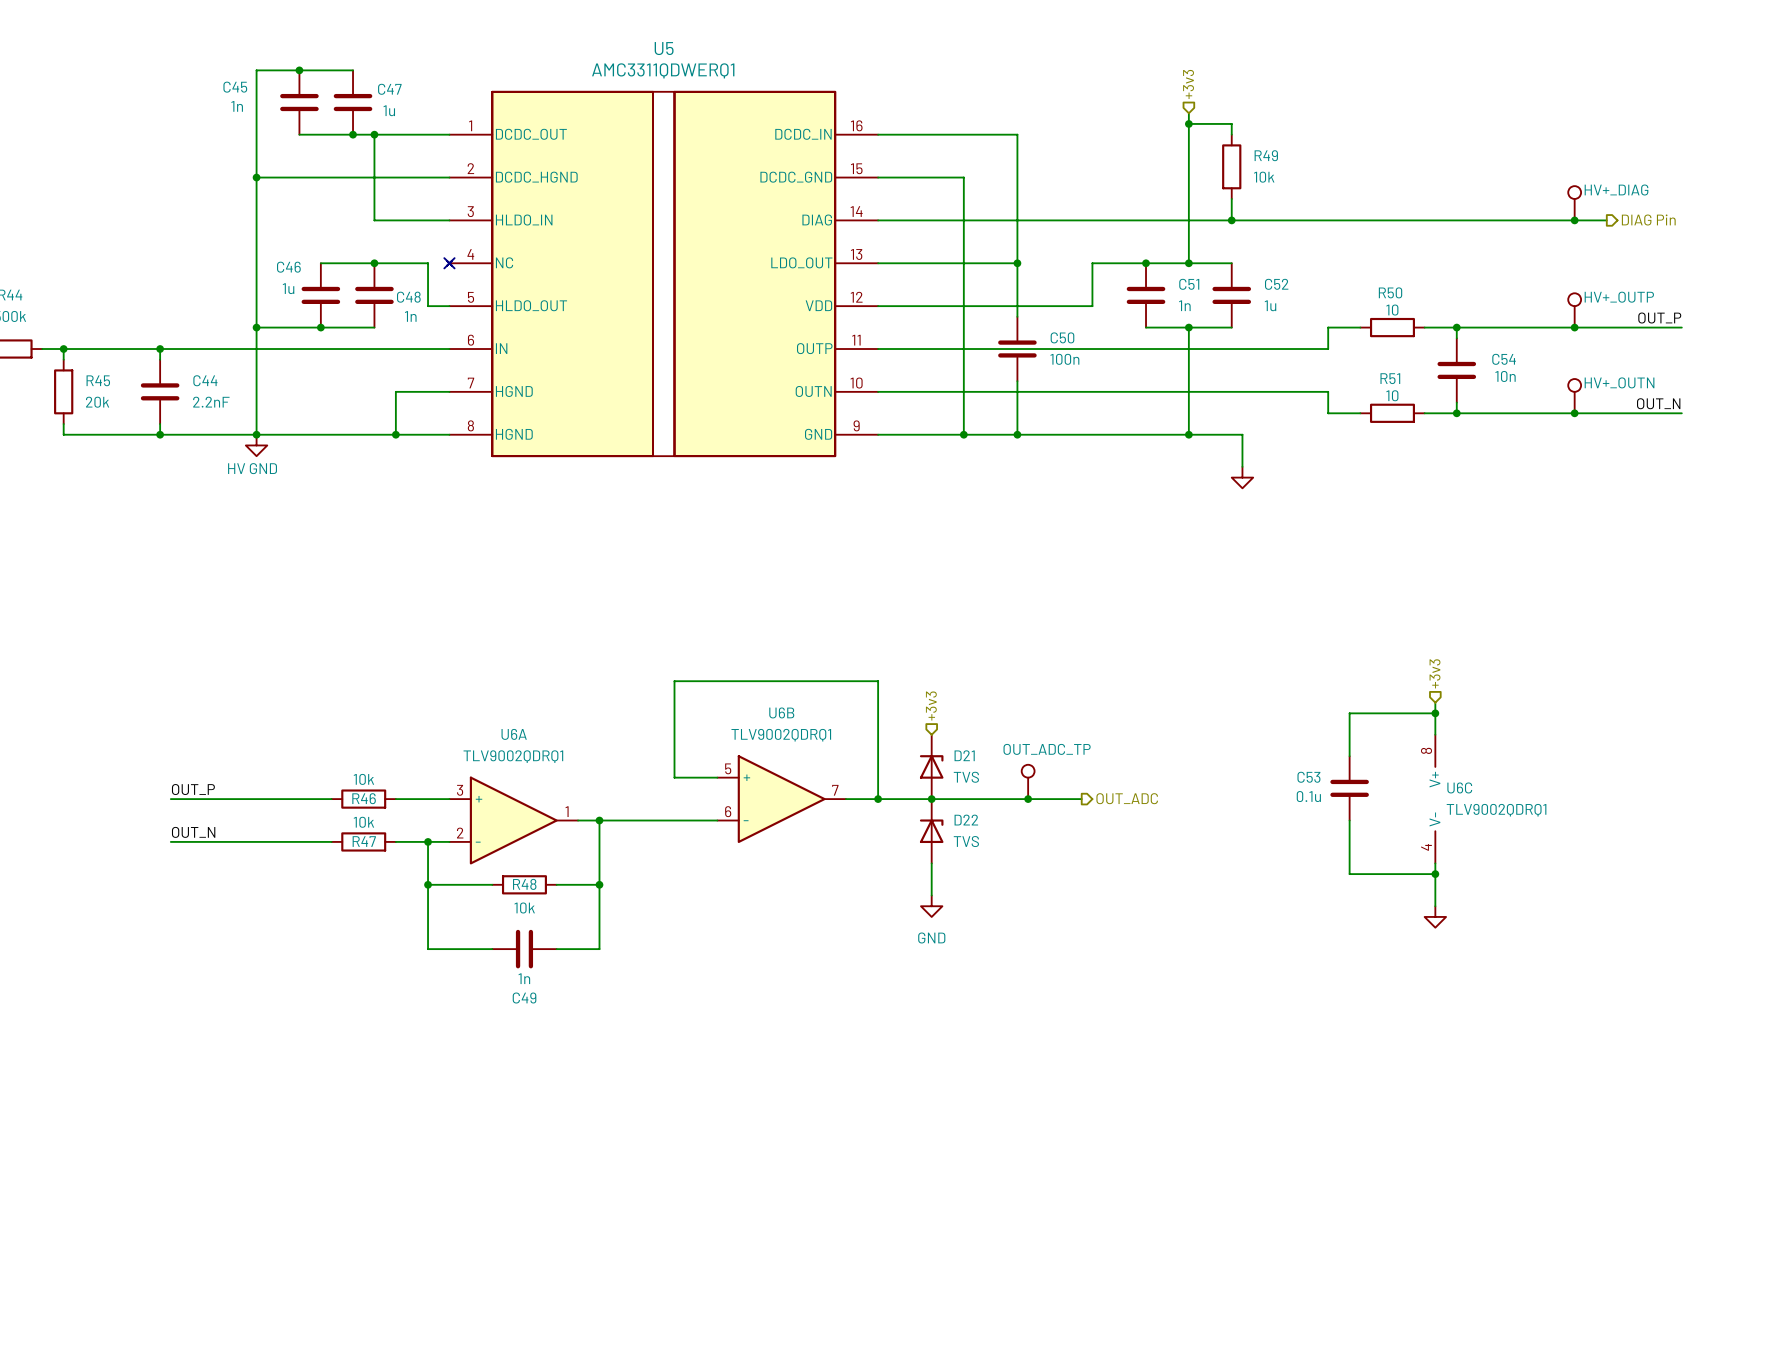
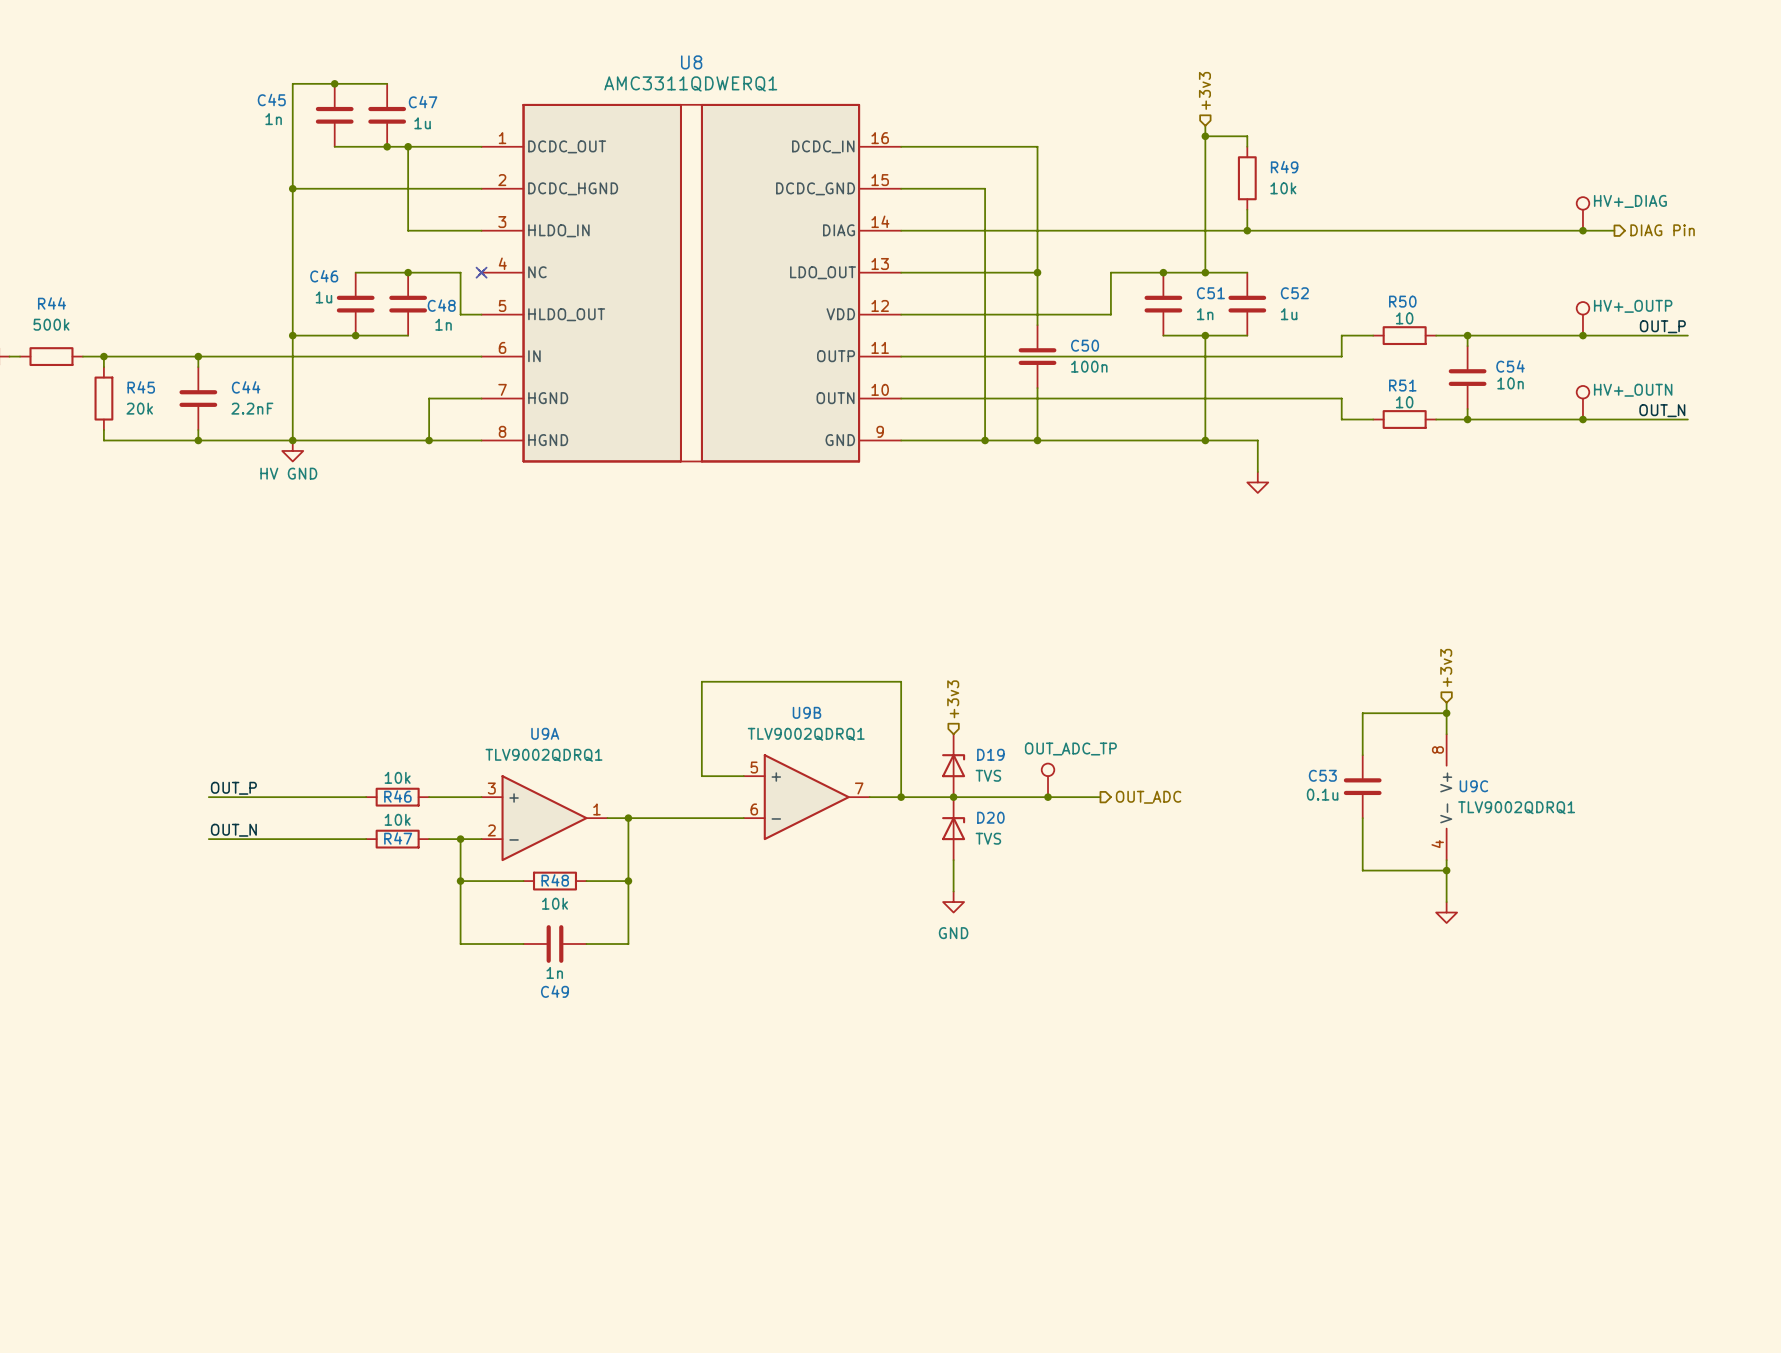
U5 name: U5 (664, 48) -> U8 (691, 62)
U6B name: U6B (781, 712) -> U9B (806, 712)
U6A name: U6A (514, 734) -> U9A (545, 733)
D21 name: D21 (964, 755) -> D19 (990, 754)
U6C name: U6C (1459, 787) -> U9C (1473, 786)
D22 name: D22 (966, 820) -> D20 (990, 817)

